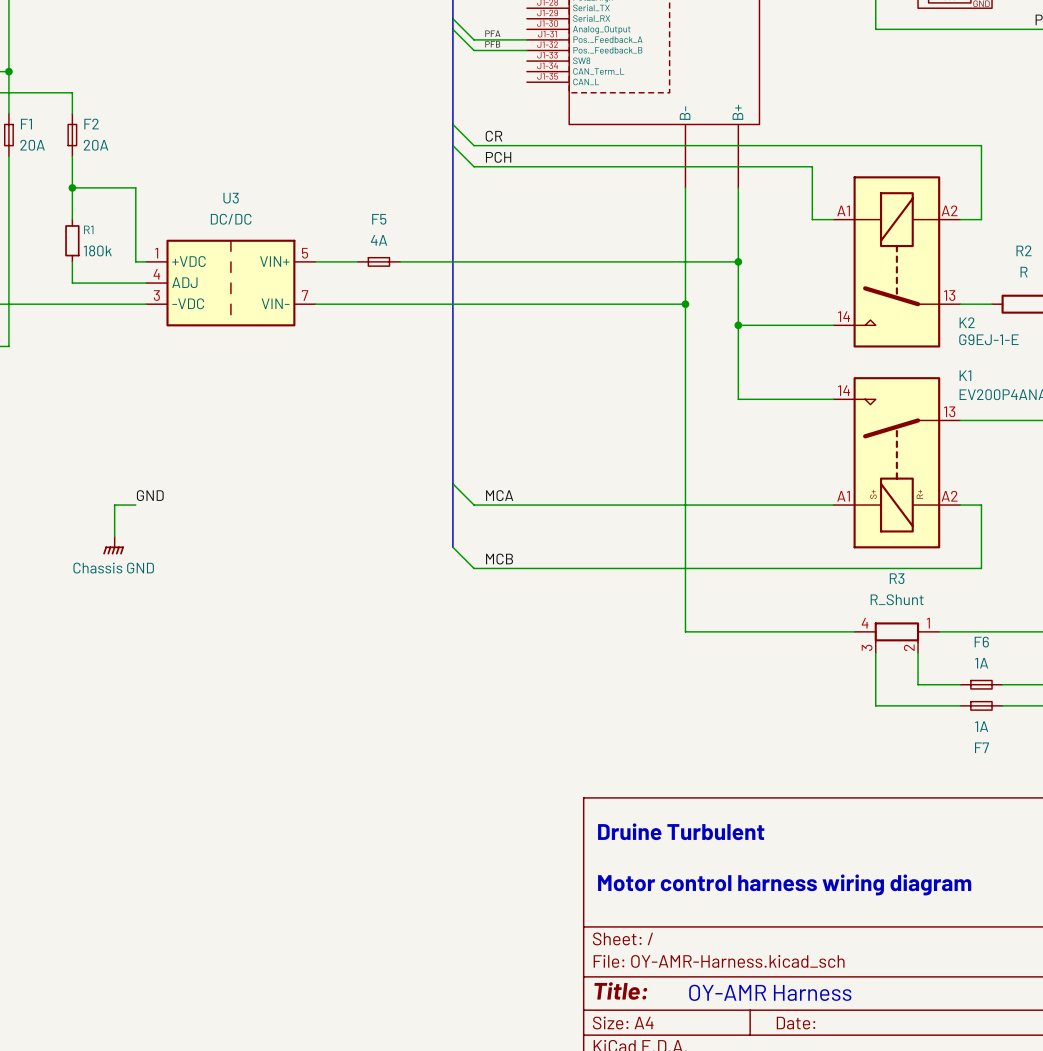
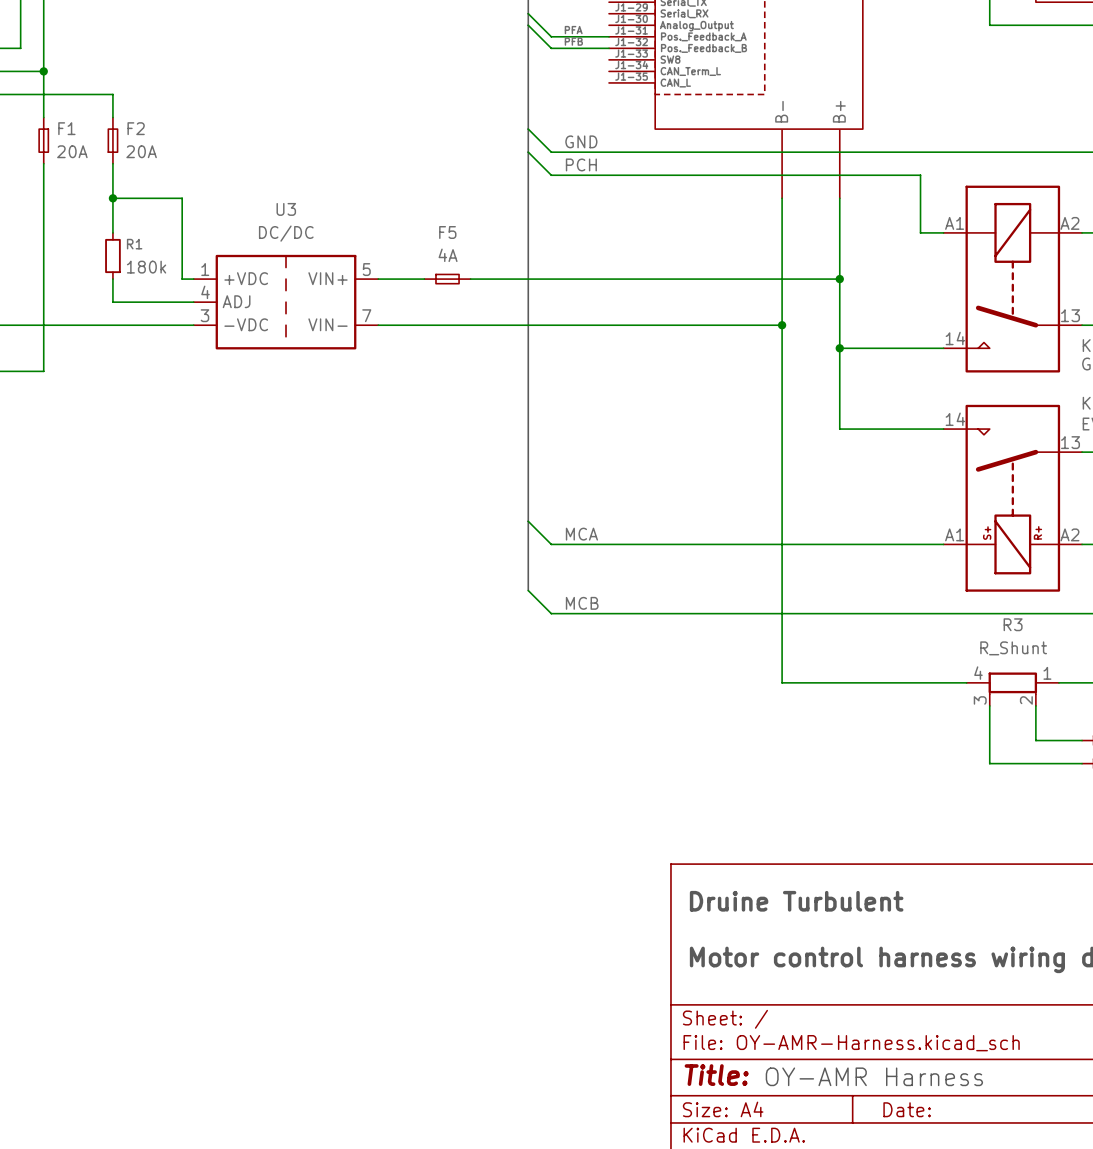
label: CR (494, 136) -> GND (581, 141)
label: GND (150, 495) -> none
wire: (135, 505) (114, 505) (114, 536) -> none
power symbol: Chassis GND (113, 545) -> none

